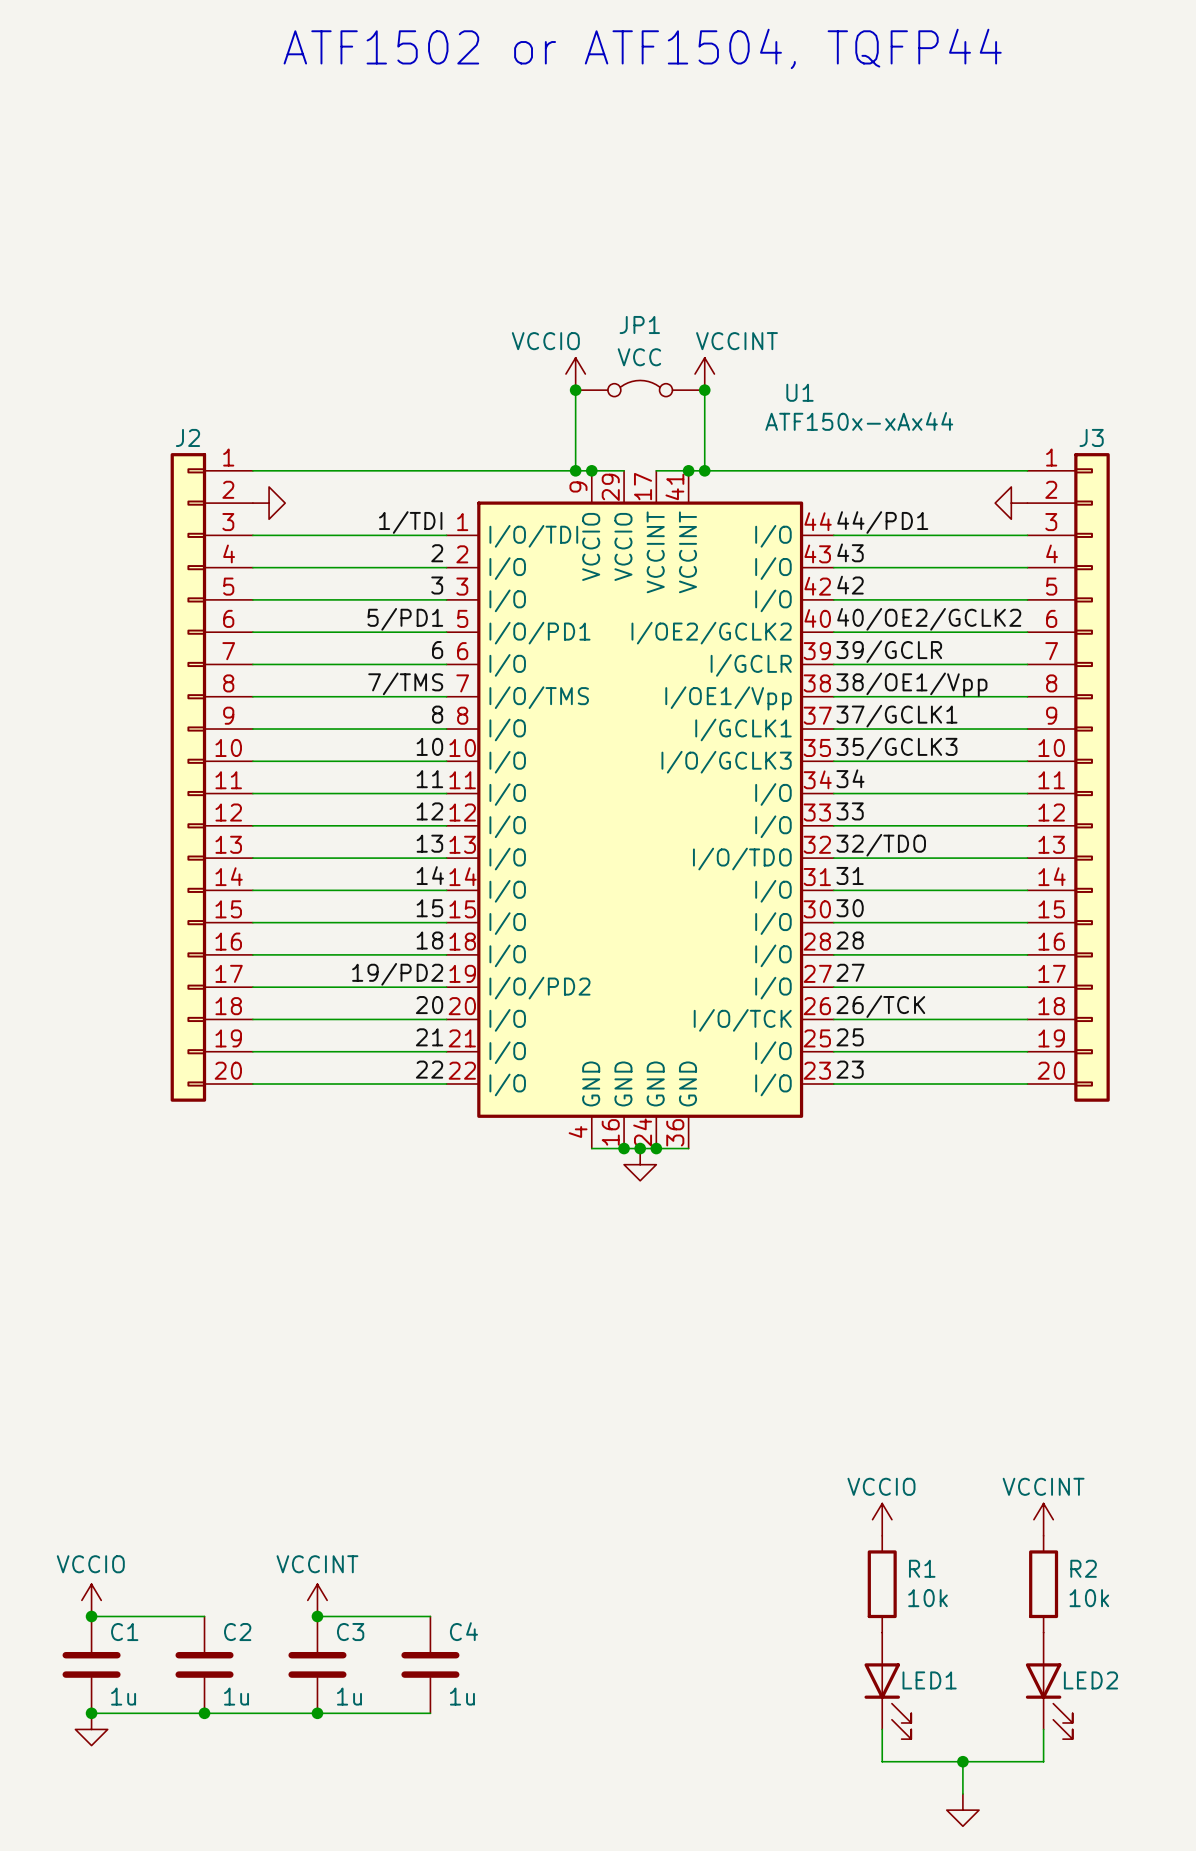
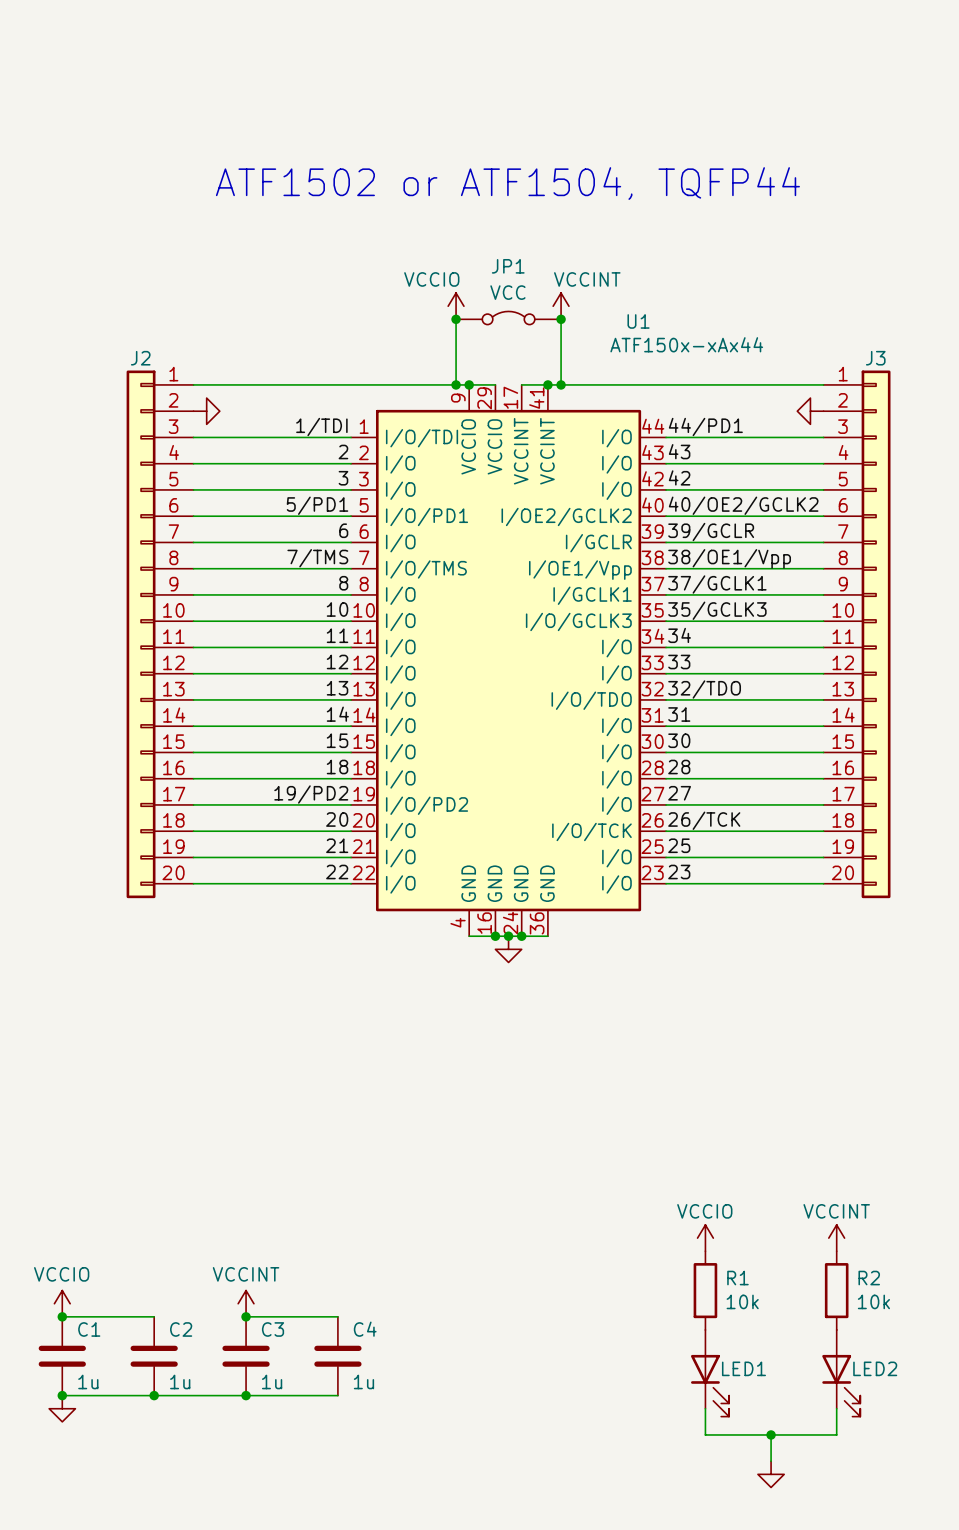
text position: ATF1502 or ATF1504, TQFP44 (642, 48) -> ATF1502 or ATF1504, TQFP44 (507, 183)

